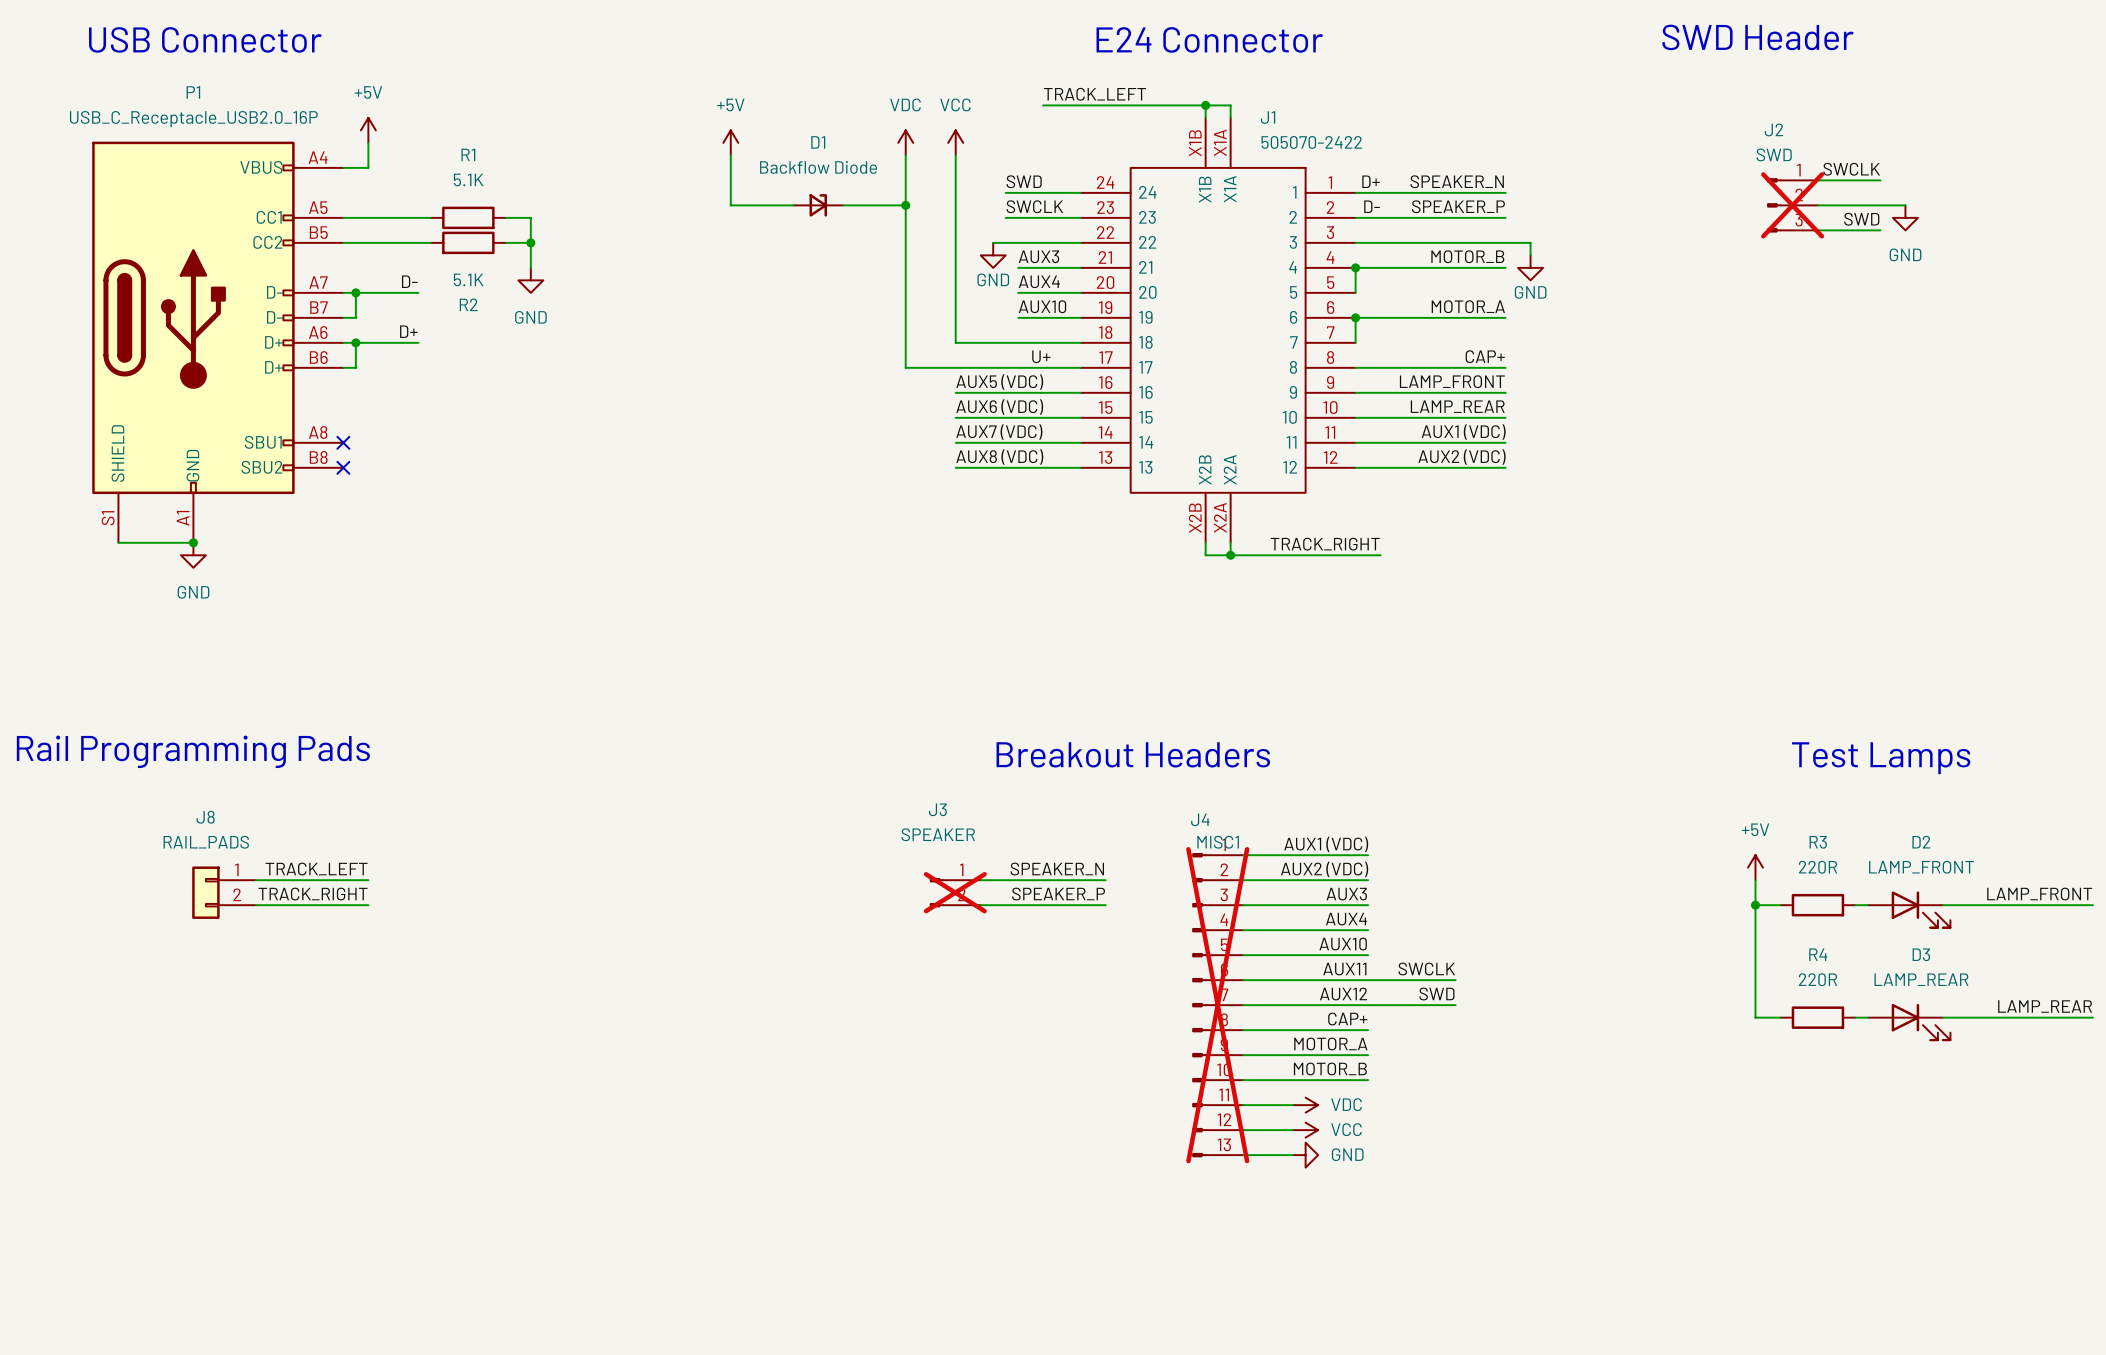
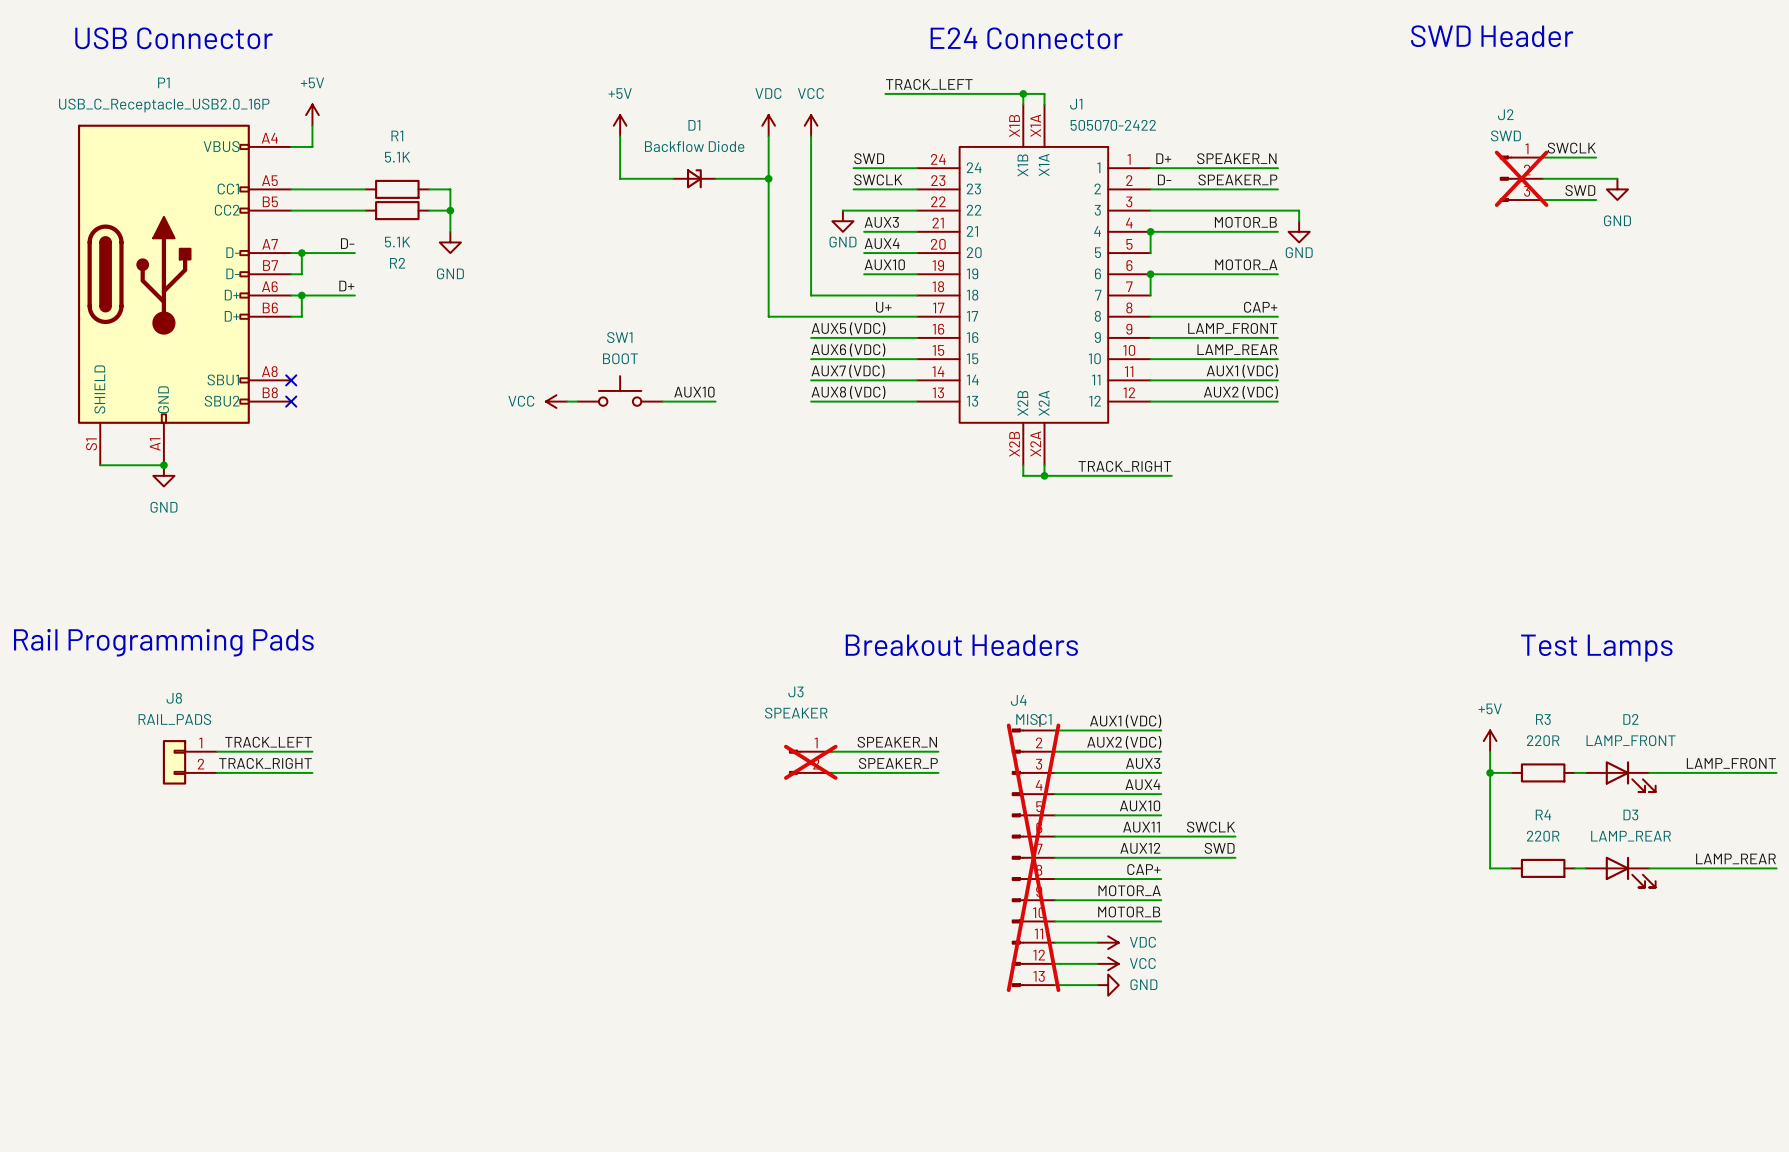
SW1: none -> BOOT (620, 390)
label: none -> AUX10 (694, 392)
power symbol: none -> VCC (556, 401)
wire: none -> (567, 401) (577, 401)
wire: none -> (662, 401) (715, 401)

